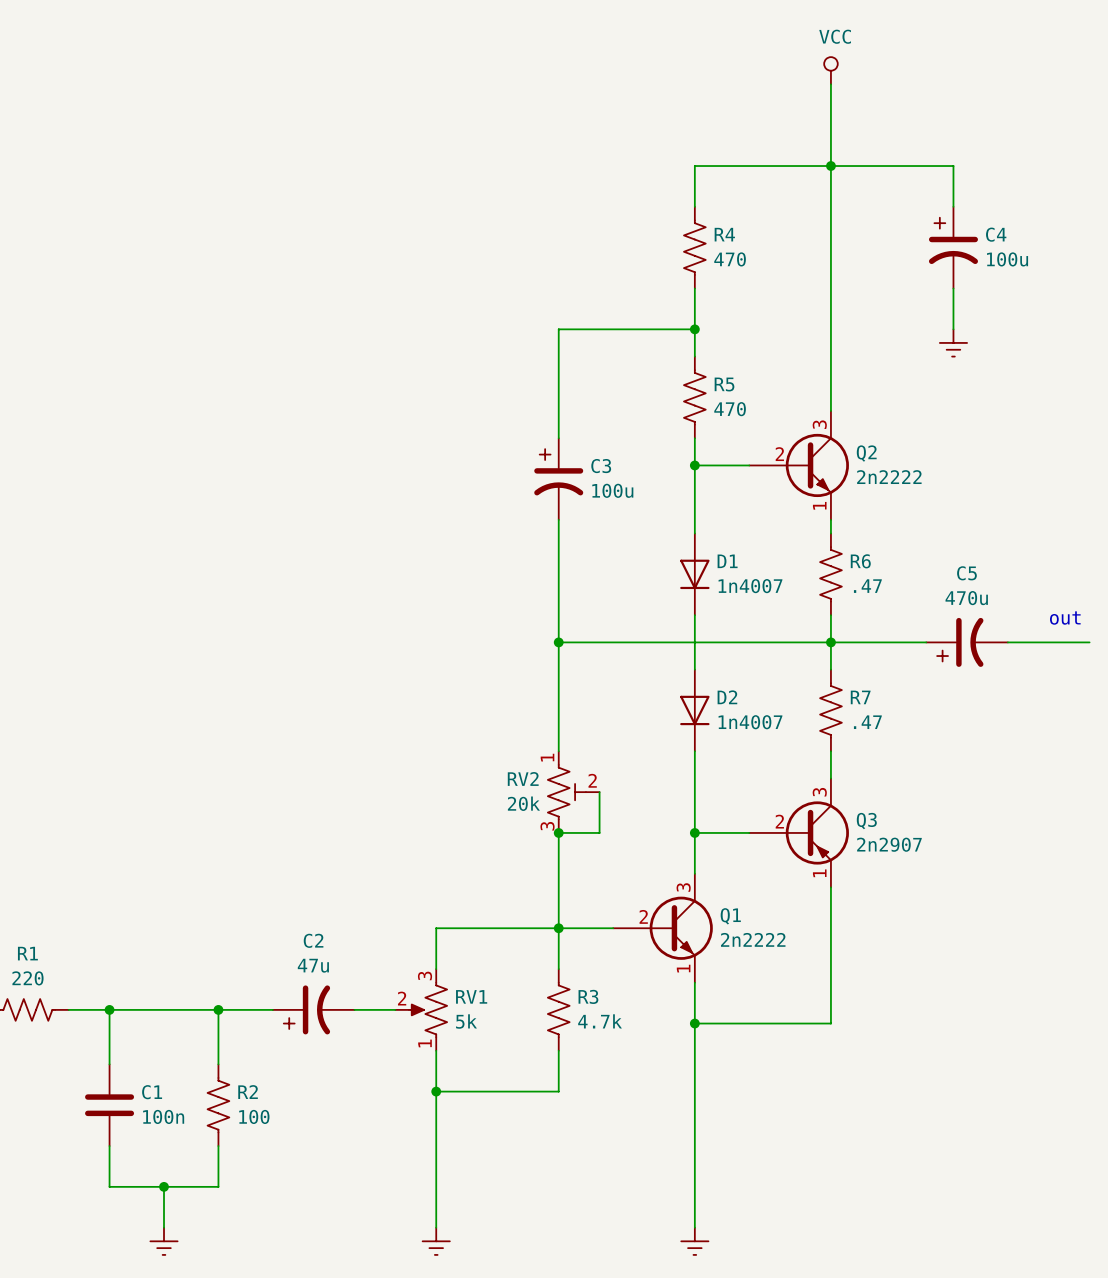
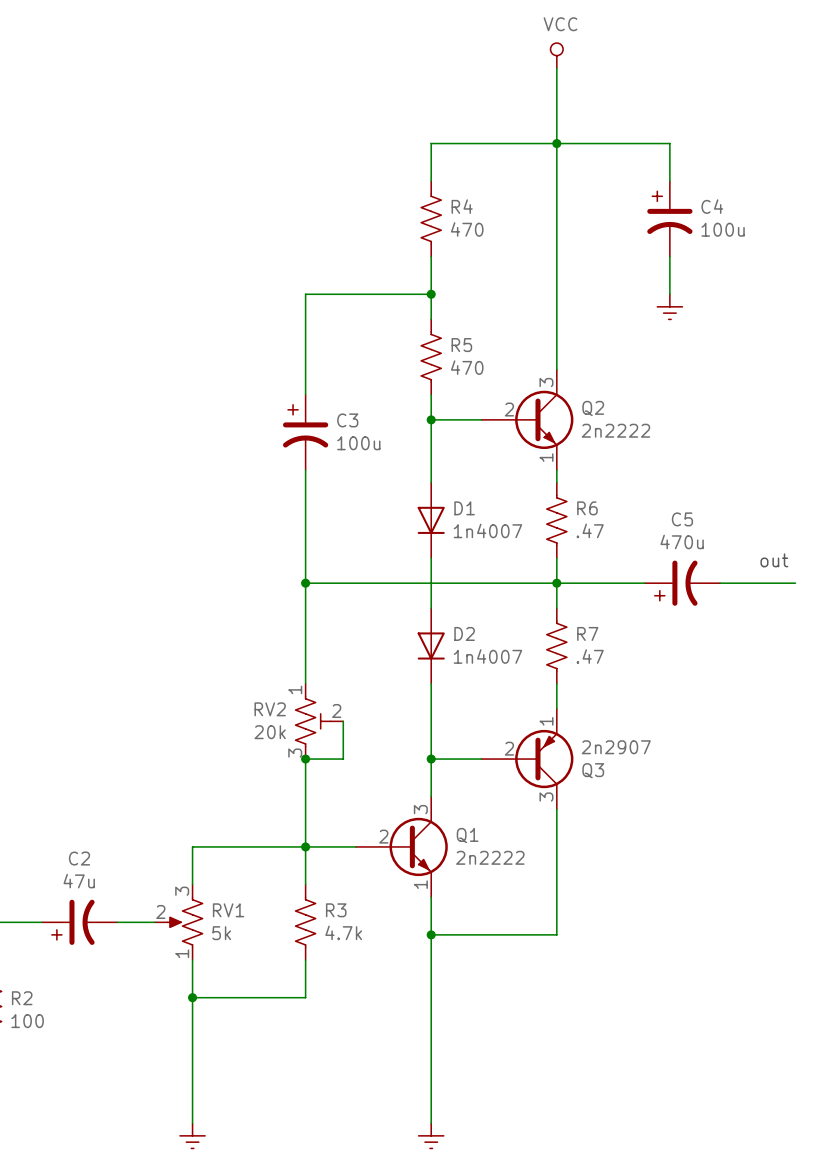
Q3 flip: as is (817, 832) -> up-down (544, 759)

